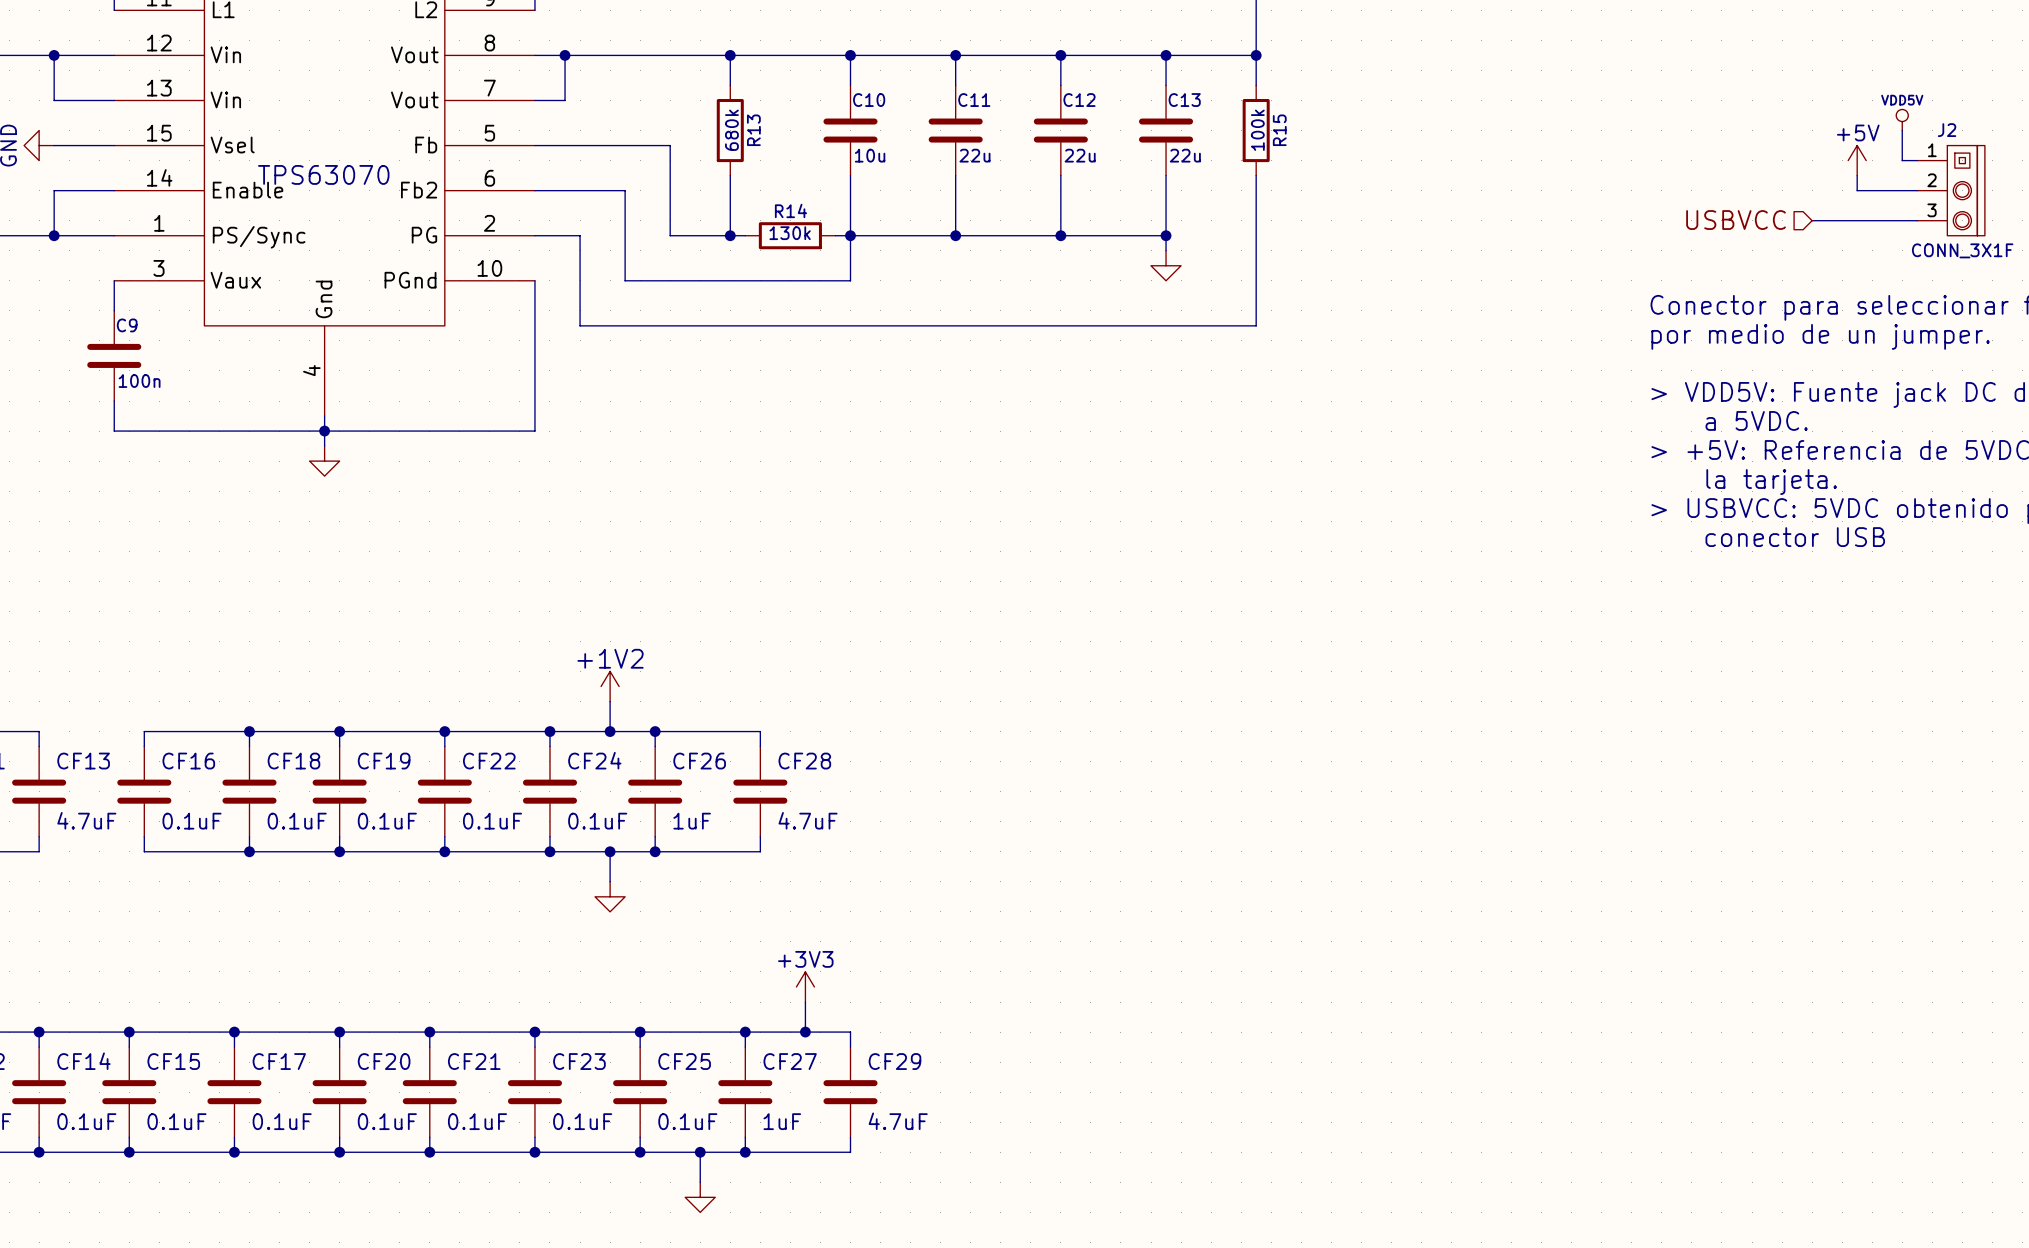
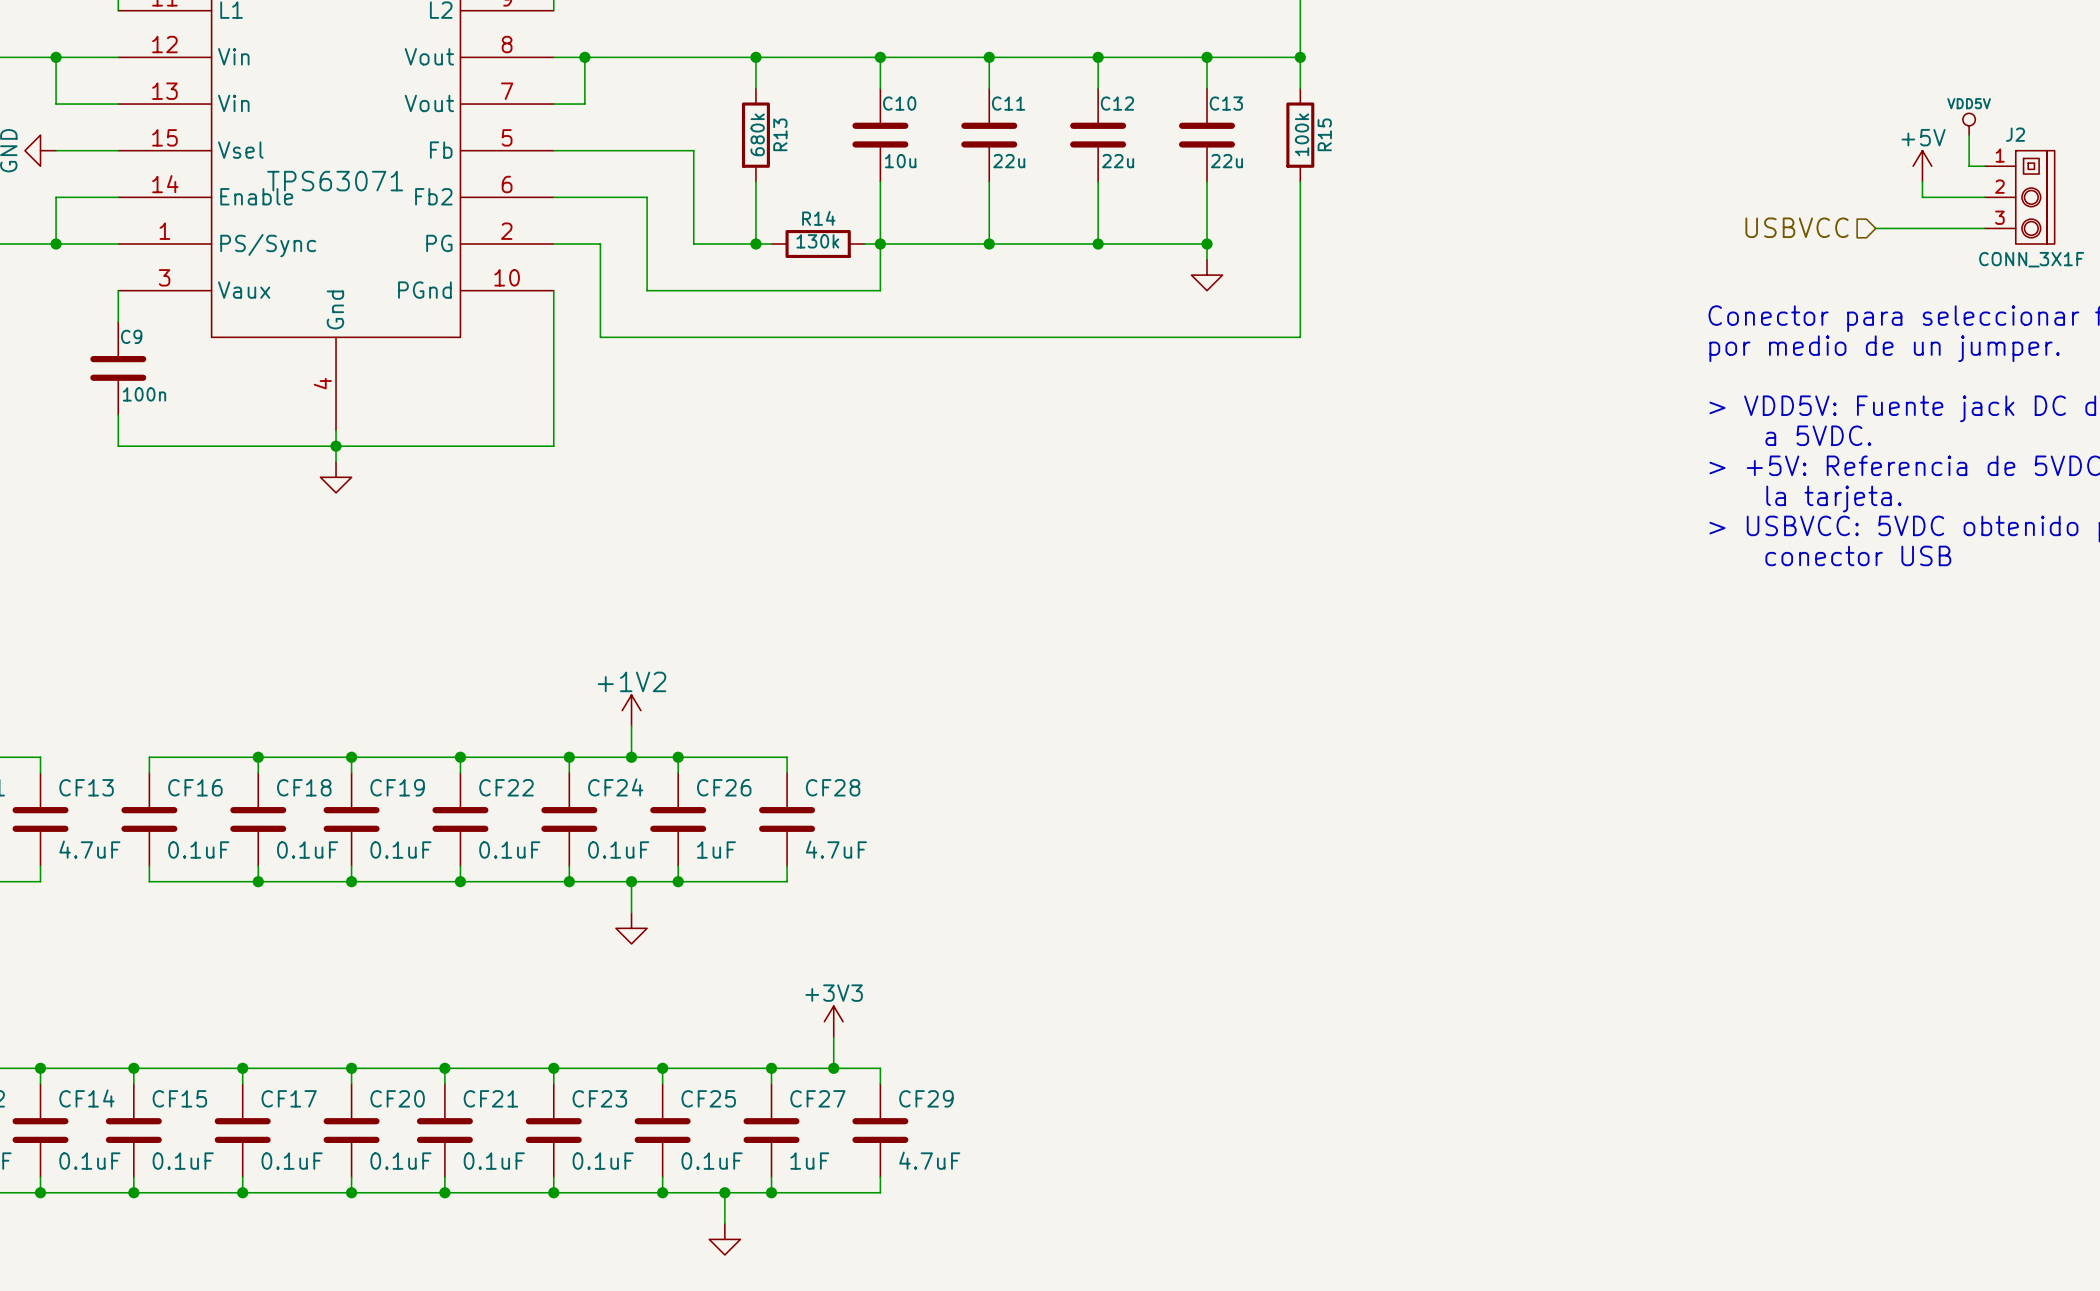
part value: TPS63070 (323, 174) -> TPS63071 (335, 181)

